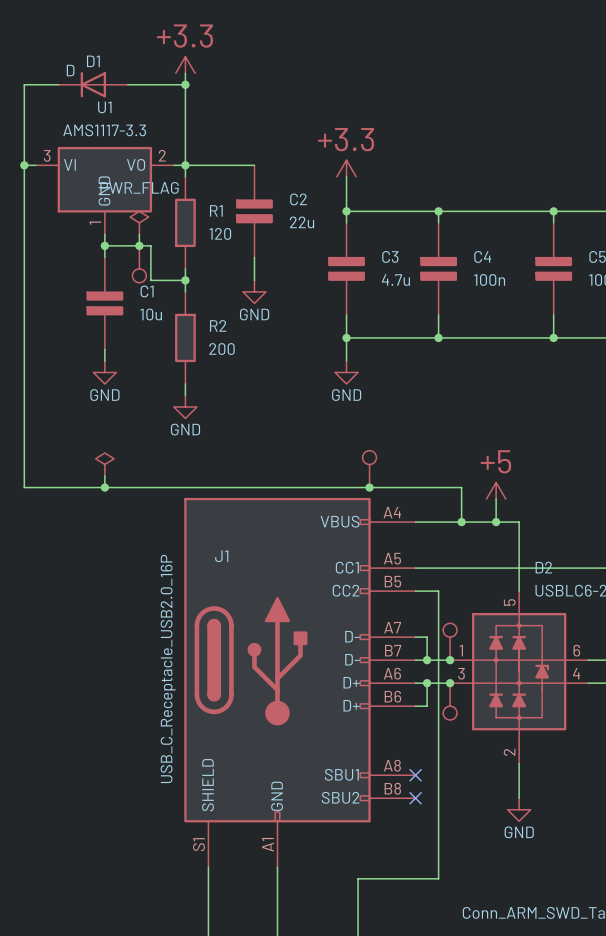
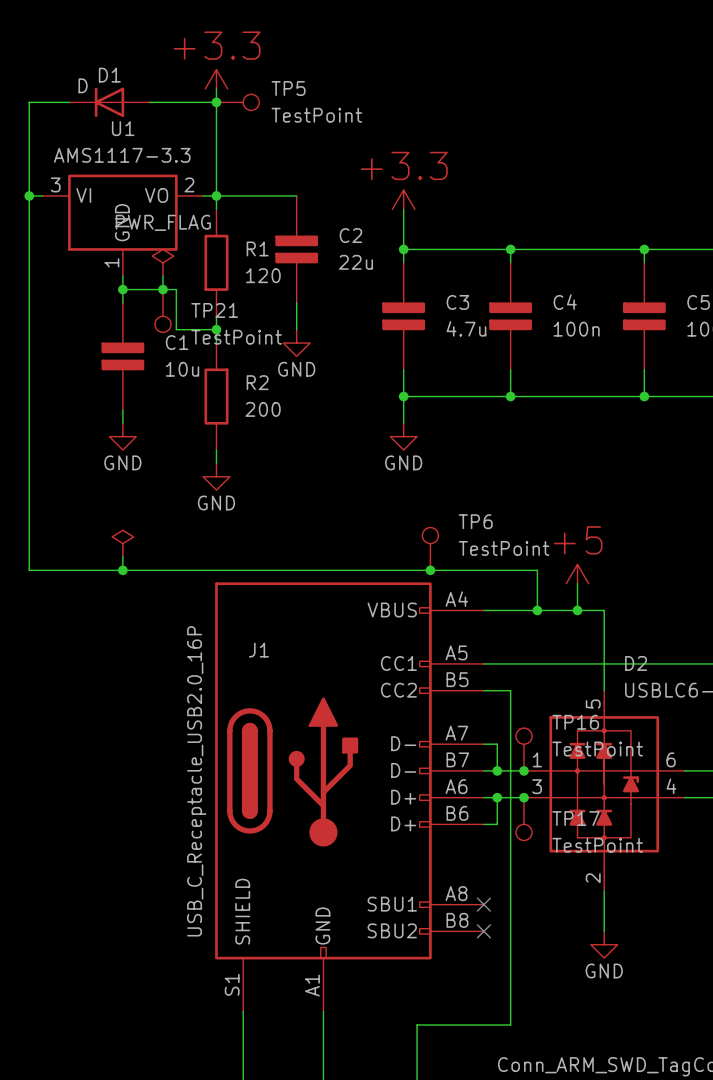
TP5: none -> TestPoint (237, 102)
TP21 name: none -> TP21 (214, 310)
TP21 value: none -> TestPoint (236, 337)
TP6 name: none -> TP6 (475, 521)
TP6 value: none -> TestPoint (504, 548)
TP16 name: none -> TP16 (575, 722)
TP16 value: none -> TestPoint (597, 749)
TP17 name: none -> TP17 (576, 818)
TP17 value: none -> TestPoint (597, 845)

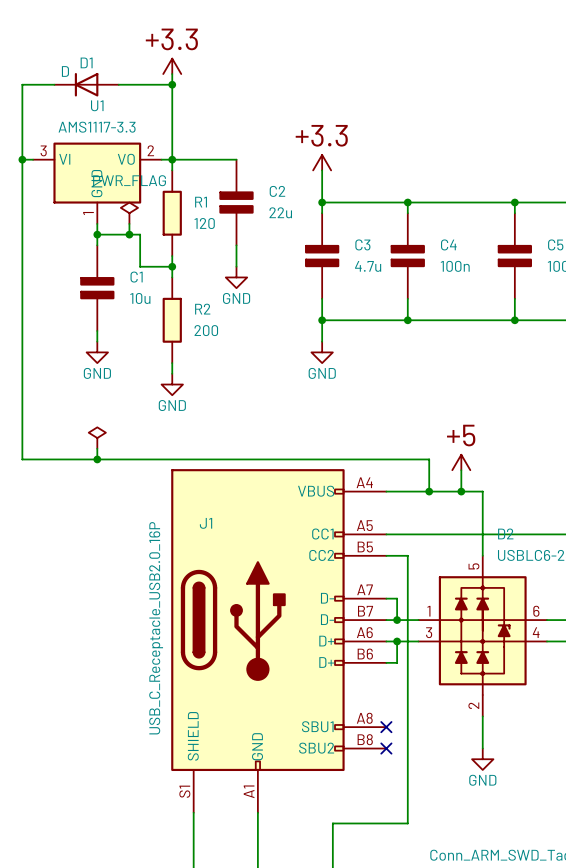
TP5: TestPoint (237, 102) -> none
TP21: TestPoint (162, 310) -> none
TP6: TestPoint (430, 548) -> none
junction: (430, 570) -> none
TP16: TestPoint (524, 749) -> none
junction: (524, 770) -> none
junction: (524, 797) -> none
TP17: TestPoint (524, 819) -> none

